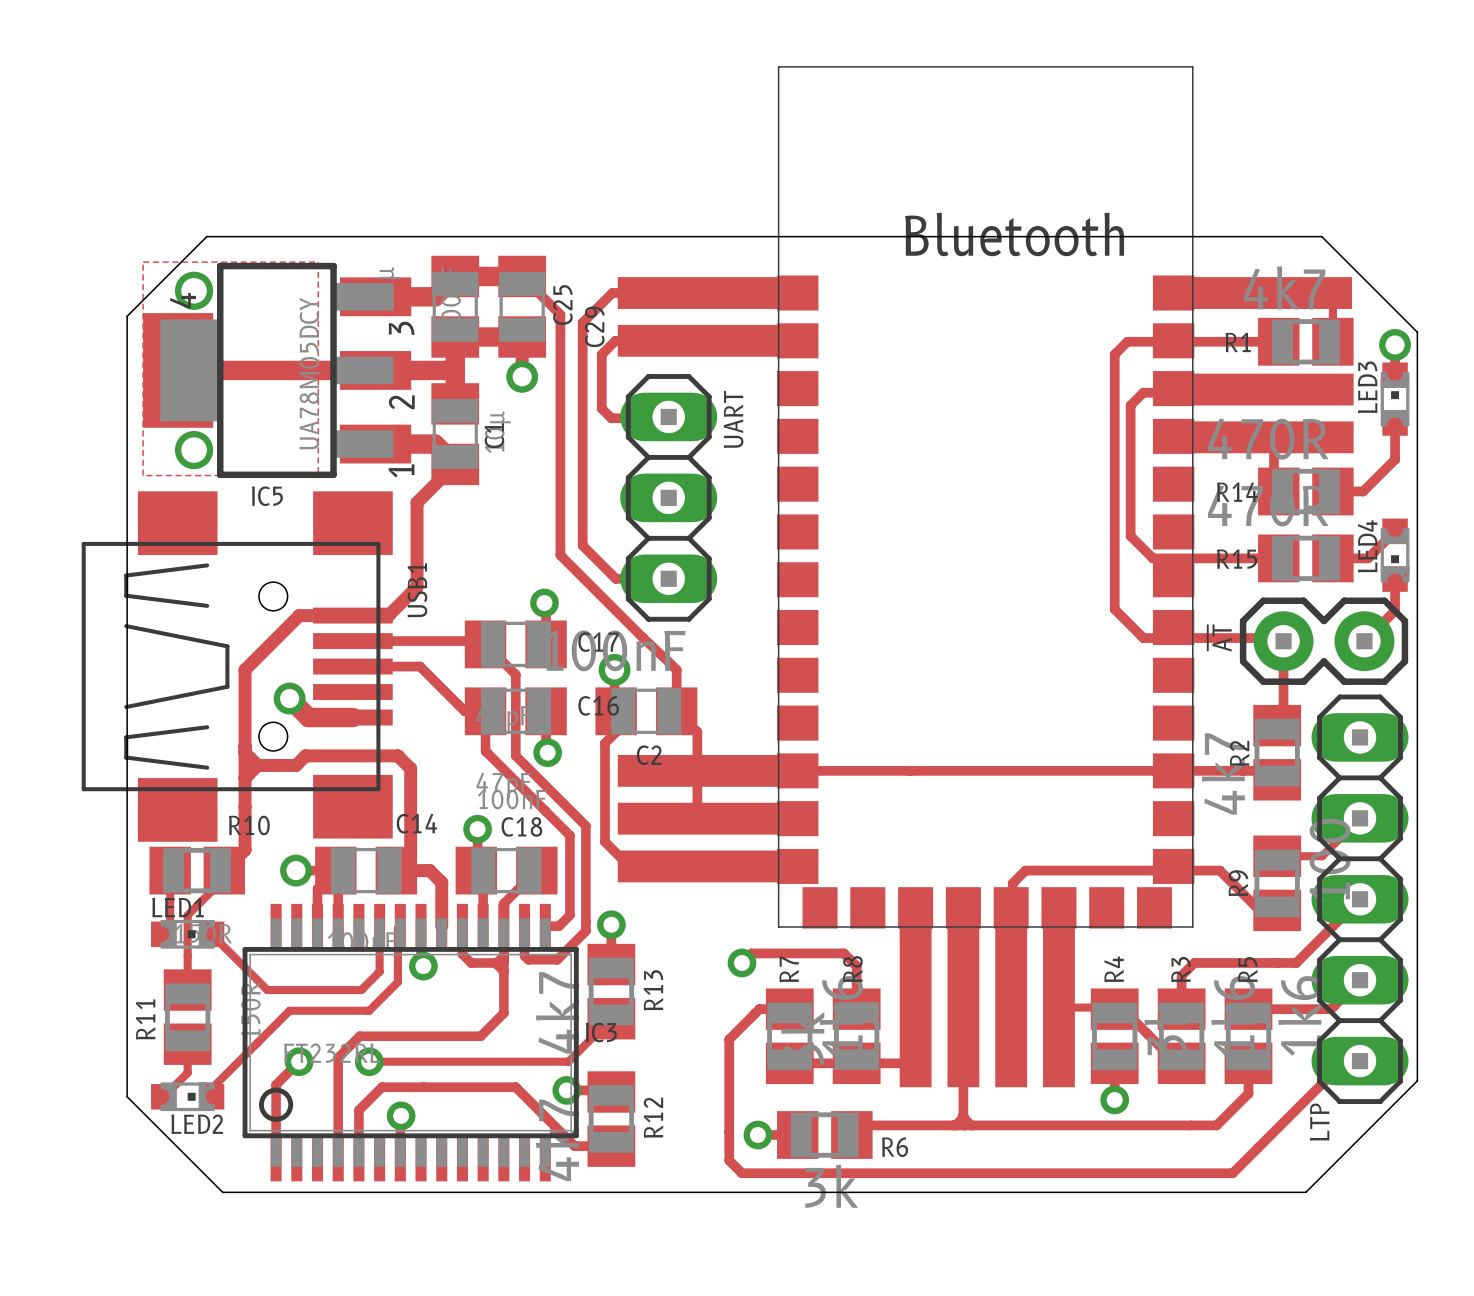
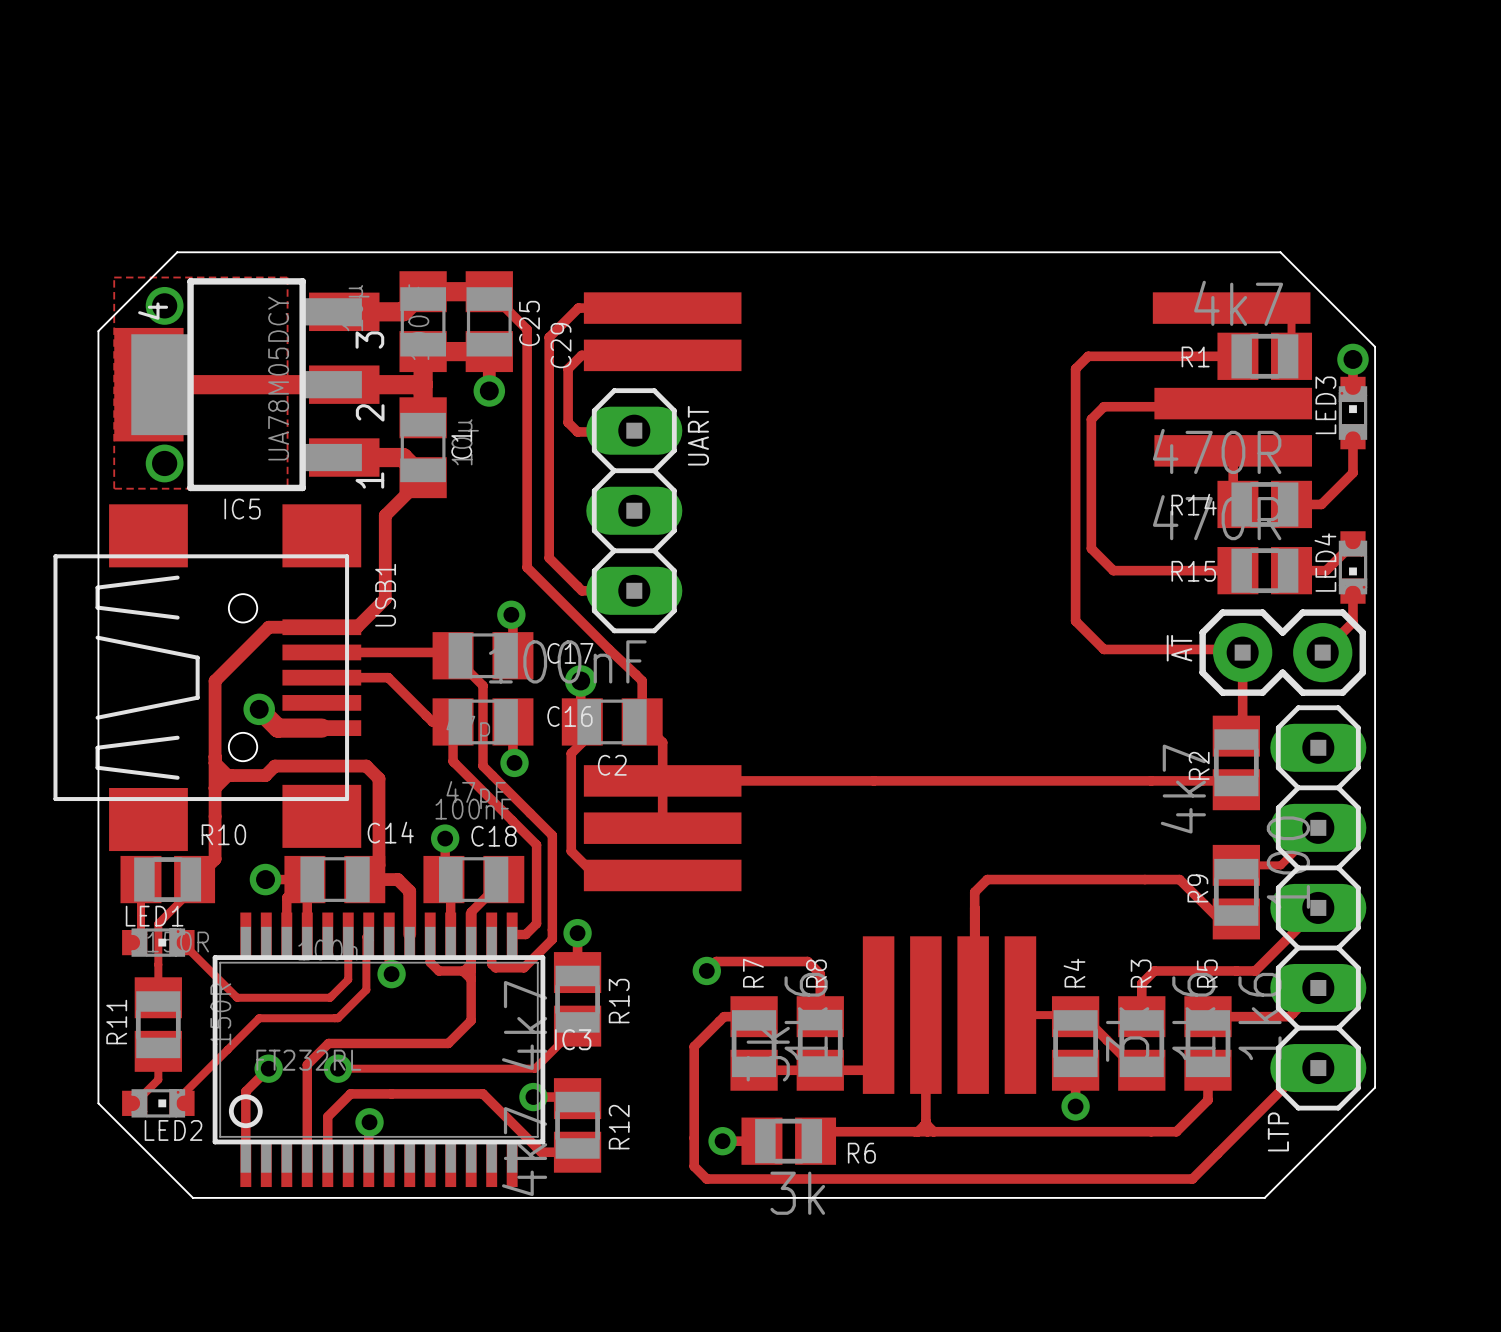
part: (985, 497) -> none

